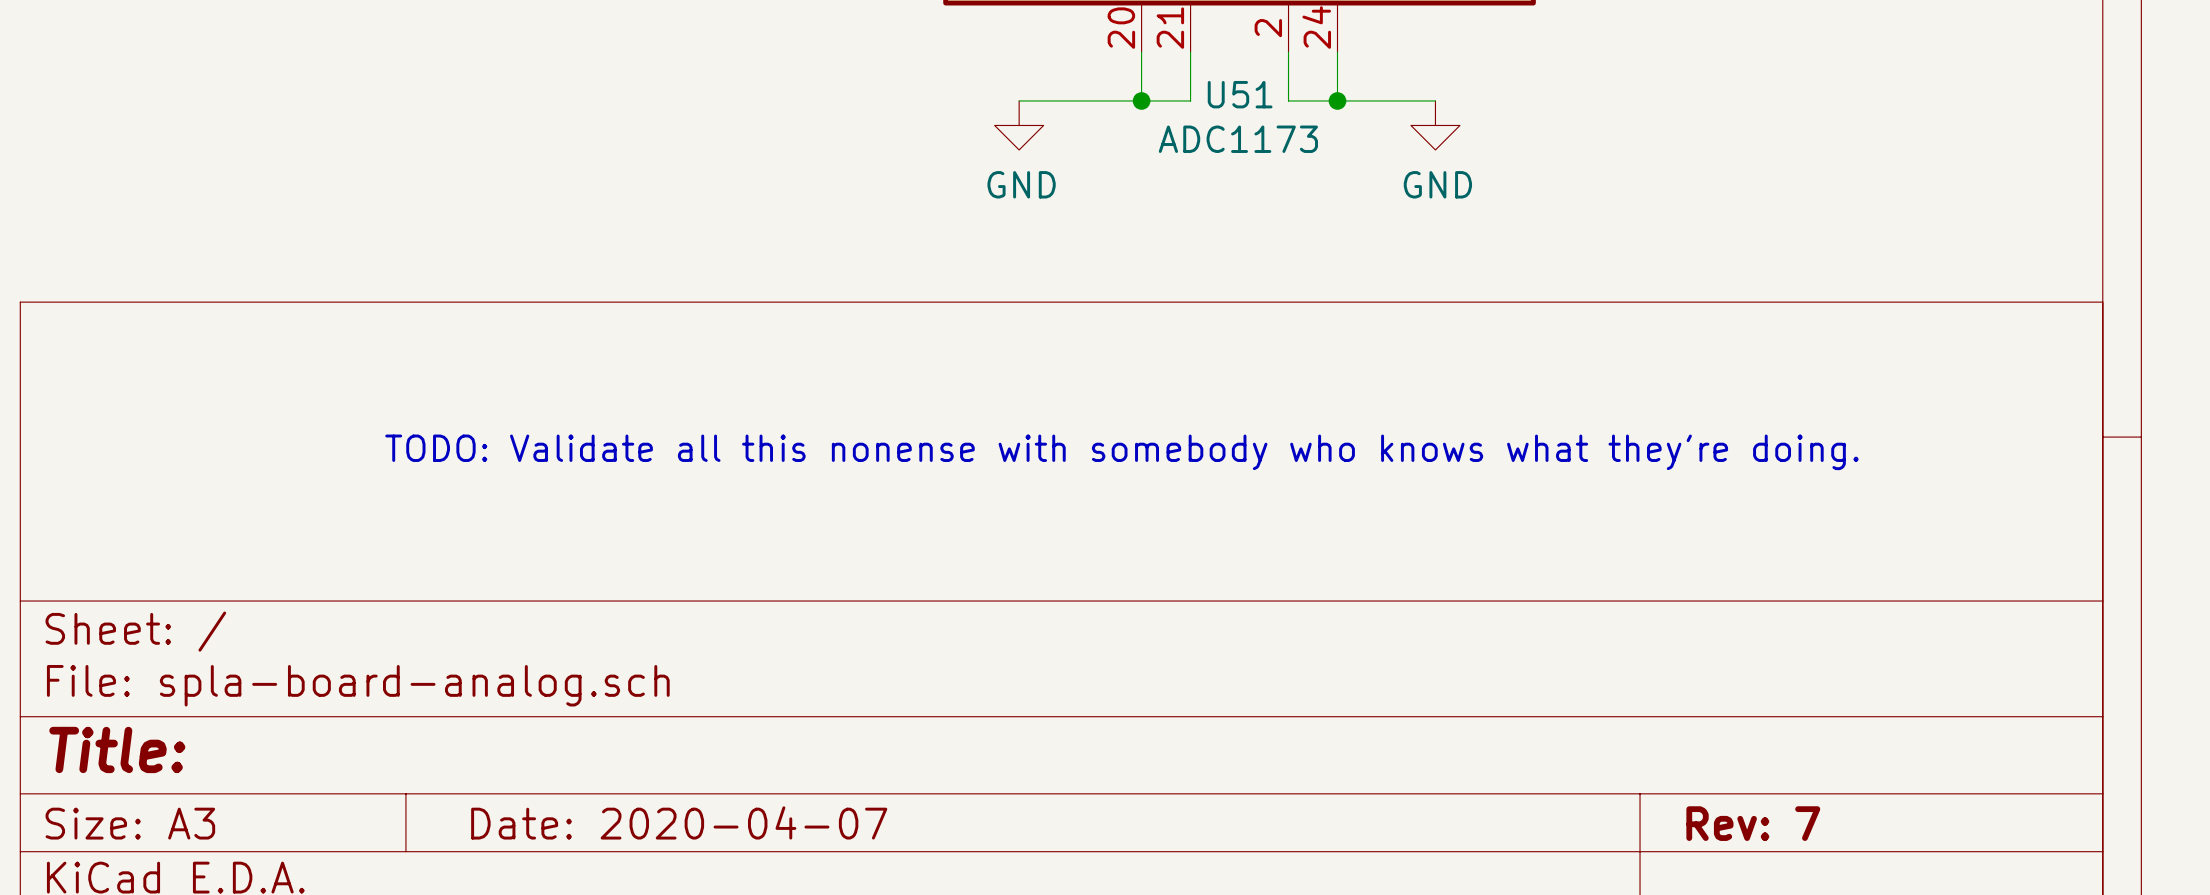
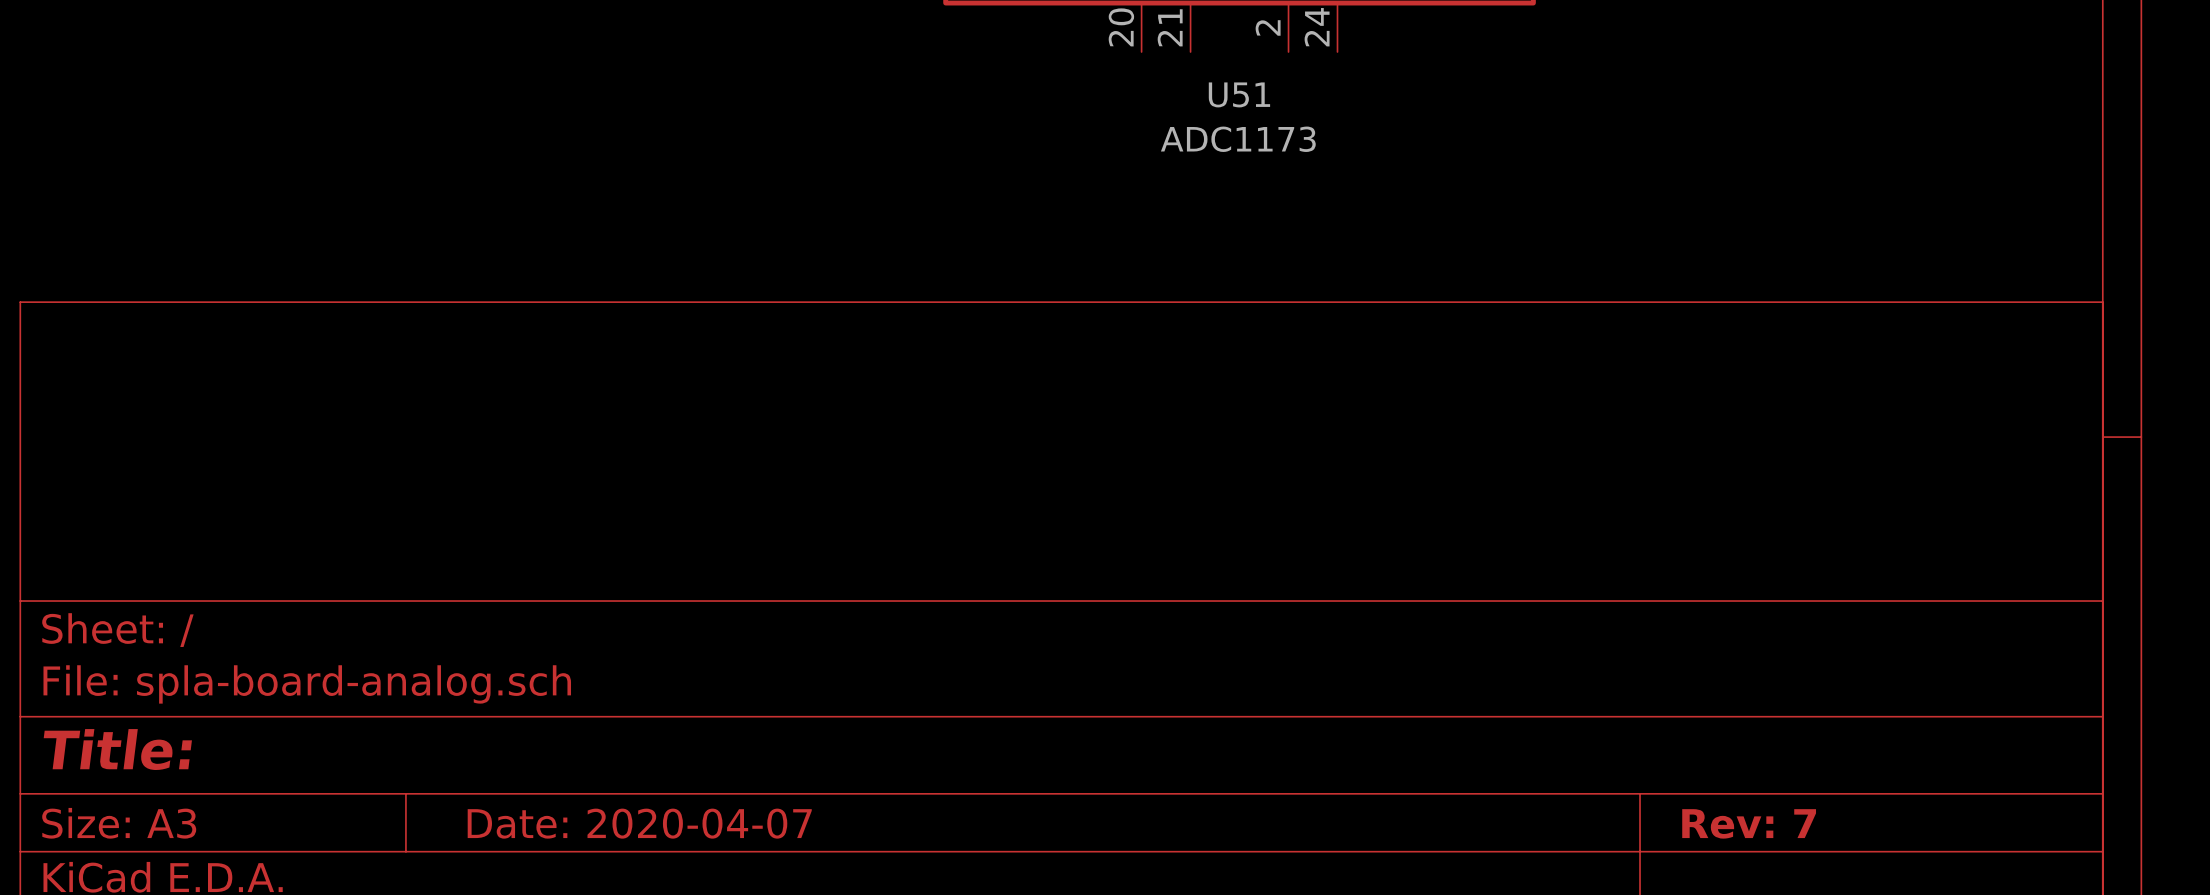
wire: (1141, 52) (1141, 100) -> none
wire: (1190, 52) (1190, 100) (1019, 100) -> none
wire: (1288, 52) (1288, 100) (1435, 100) -> none
wire: (1337, 52) (1337, 100) -> none
junction: (1141, 100) -> none
junction: (1337, 100) -> none
power symbol: GND (1019, 125) -> none
power symbol: GND (1435, 125) -> none
text: TODO: Validate all this nonense with somebody who knows what they're doing. (1121, 452) -> none

